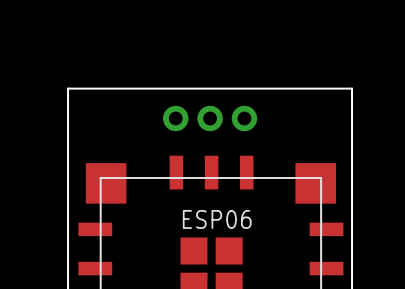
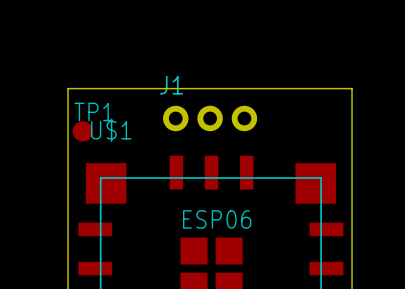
J1 name: none -> J1 (171, 85)
U$1 name: none -> U$1 (111, 130)
TP1: none -> (82, 131)

